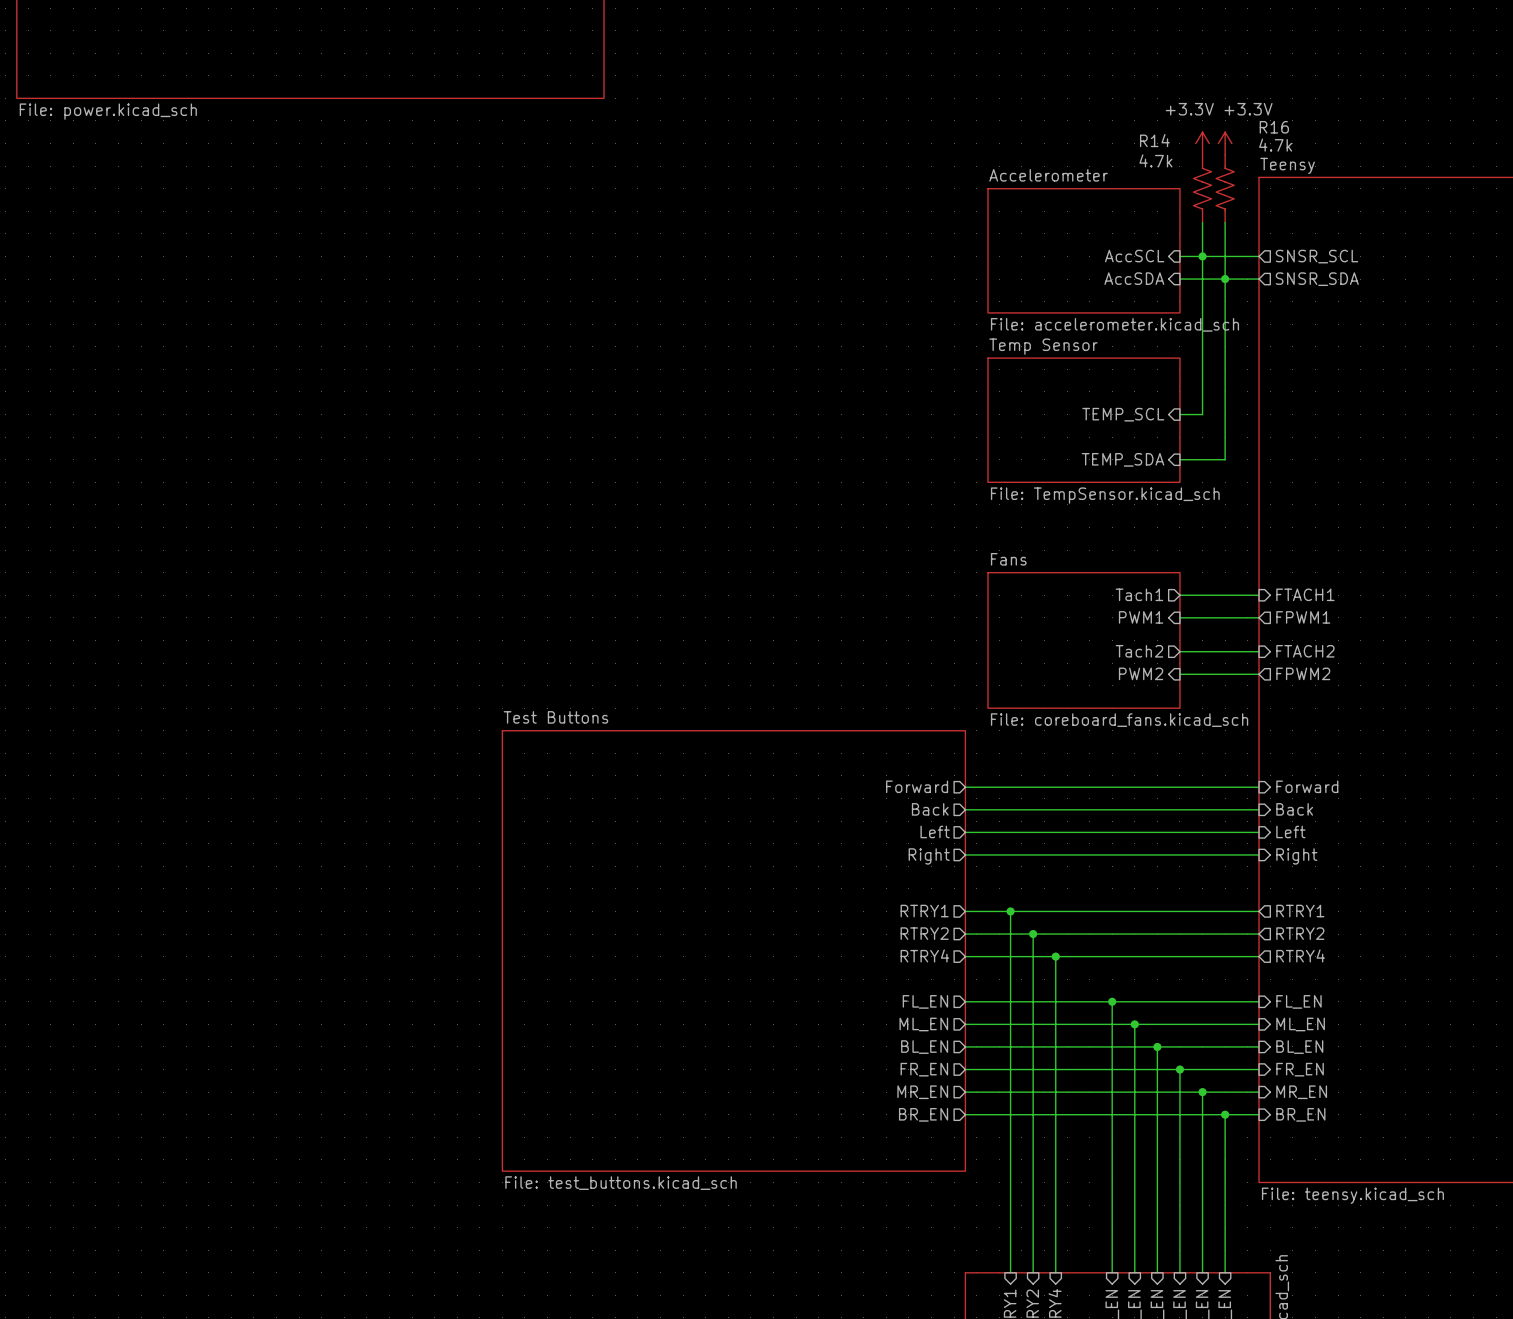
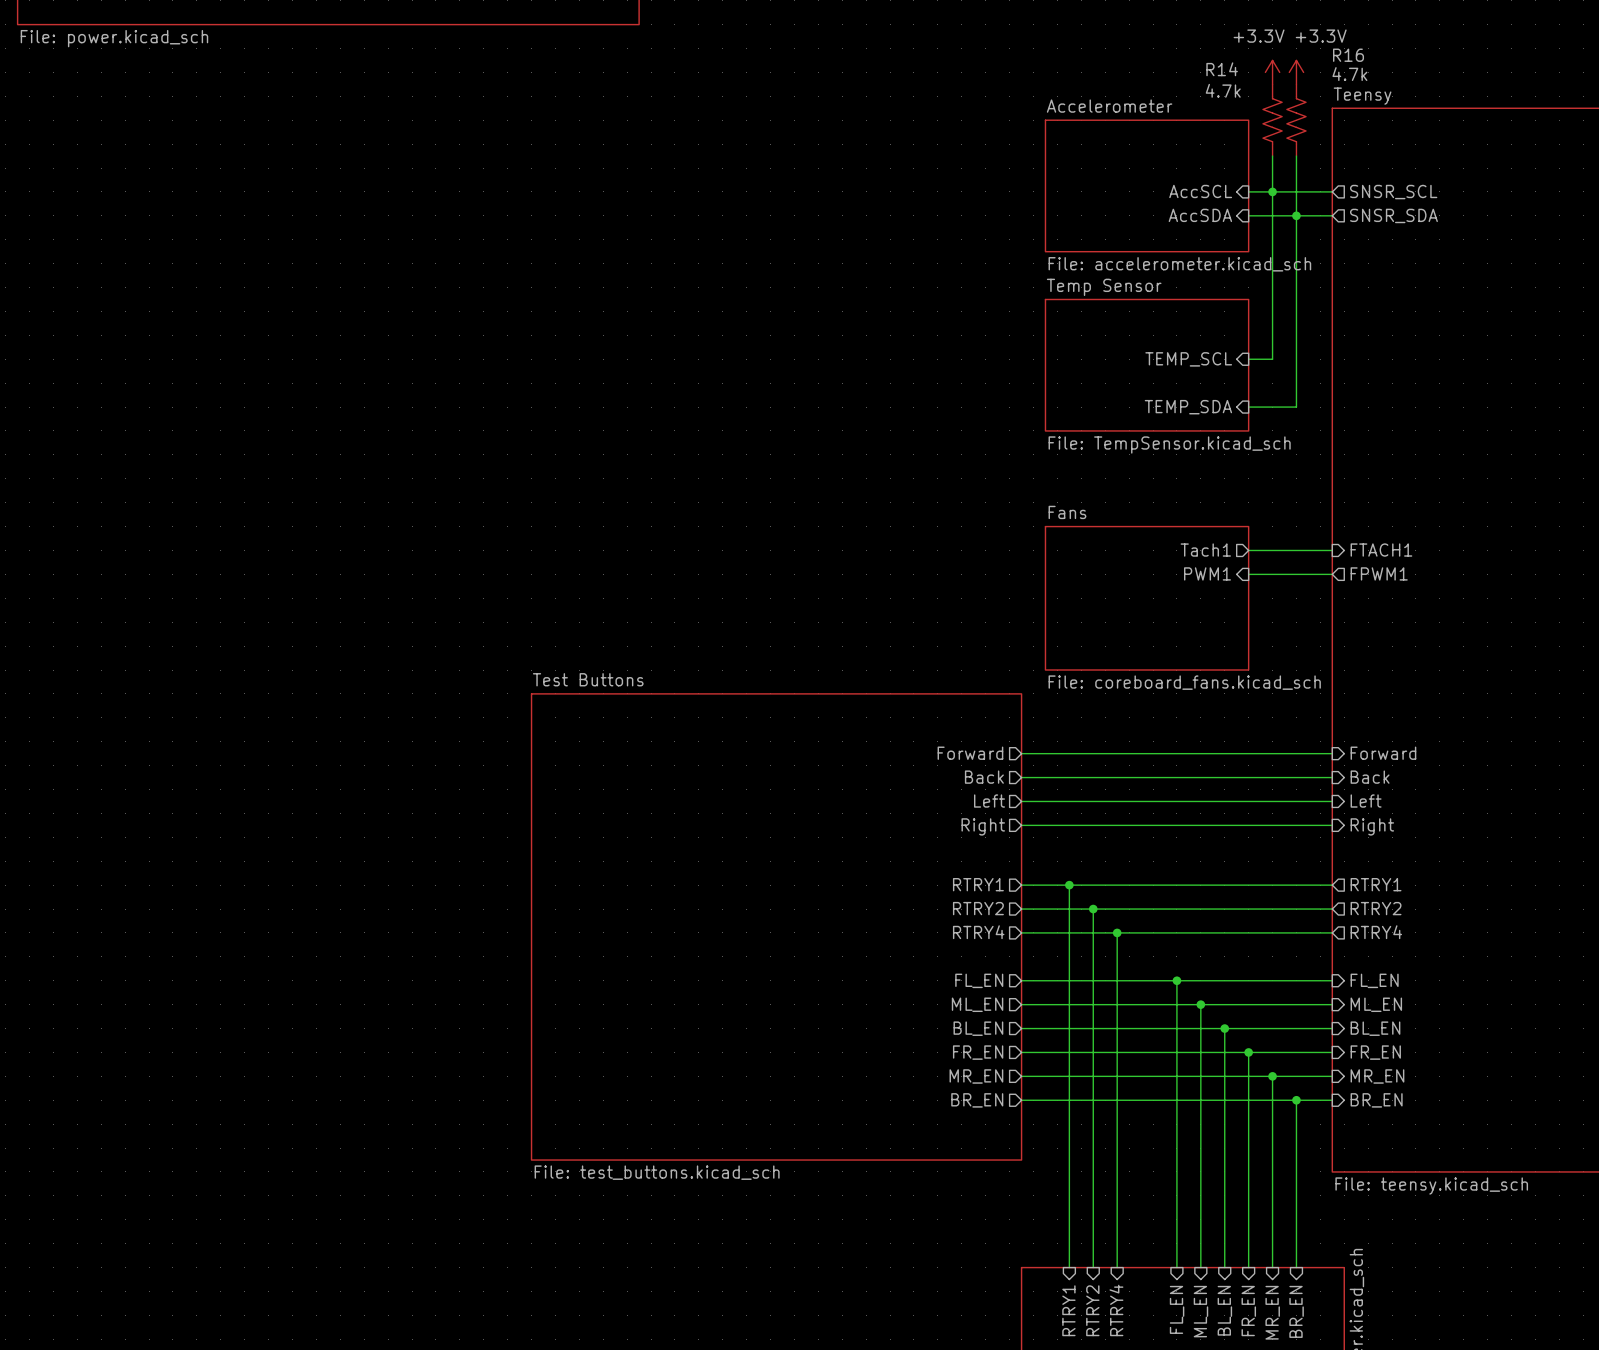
sheet pin: Tach2 (1139, 651) -> none
wire: (1179, 651) (1259, 651) -> none
sheet pin: FTACH2 (1305, 651) -> none
sheet pin: PWM2 (1141, 673) -> none
sheet pin: FPWM2 (1303, 673) -> none
wire: (1179, 674) (1259, 674) -> none

